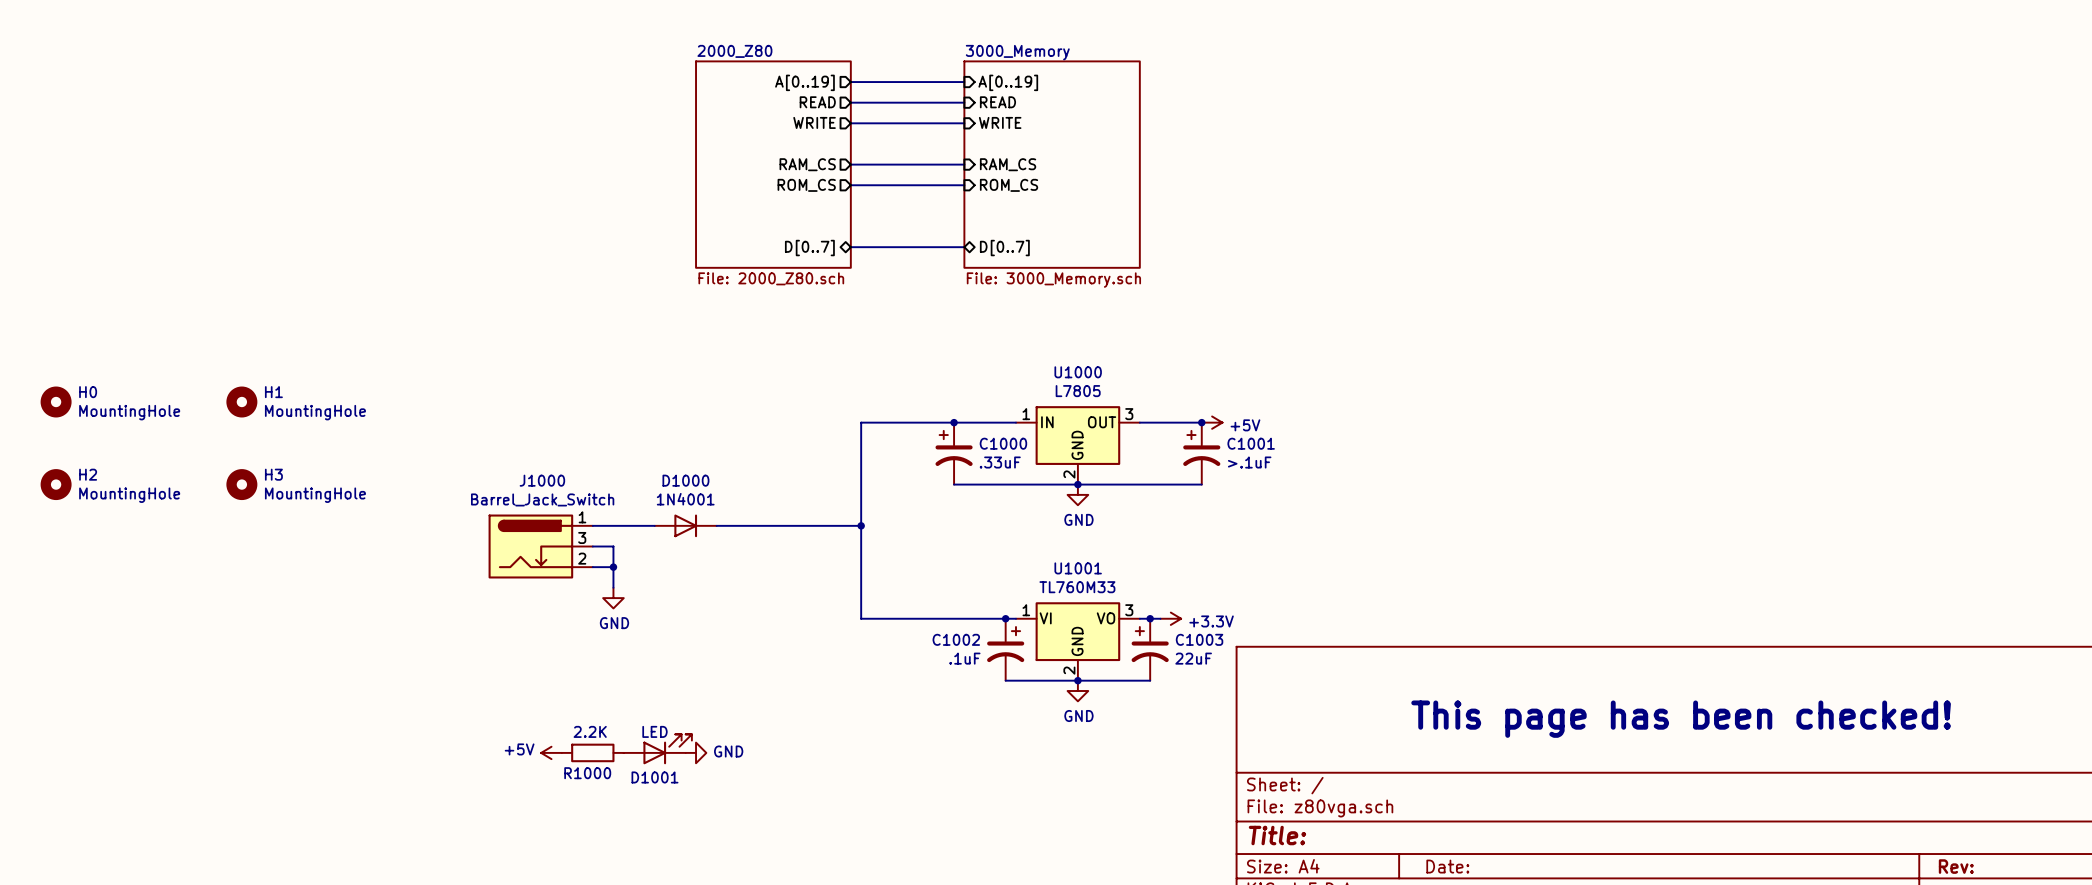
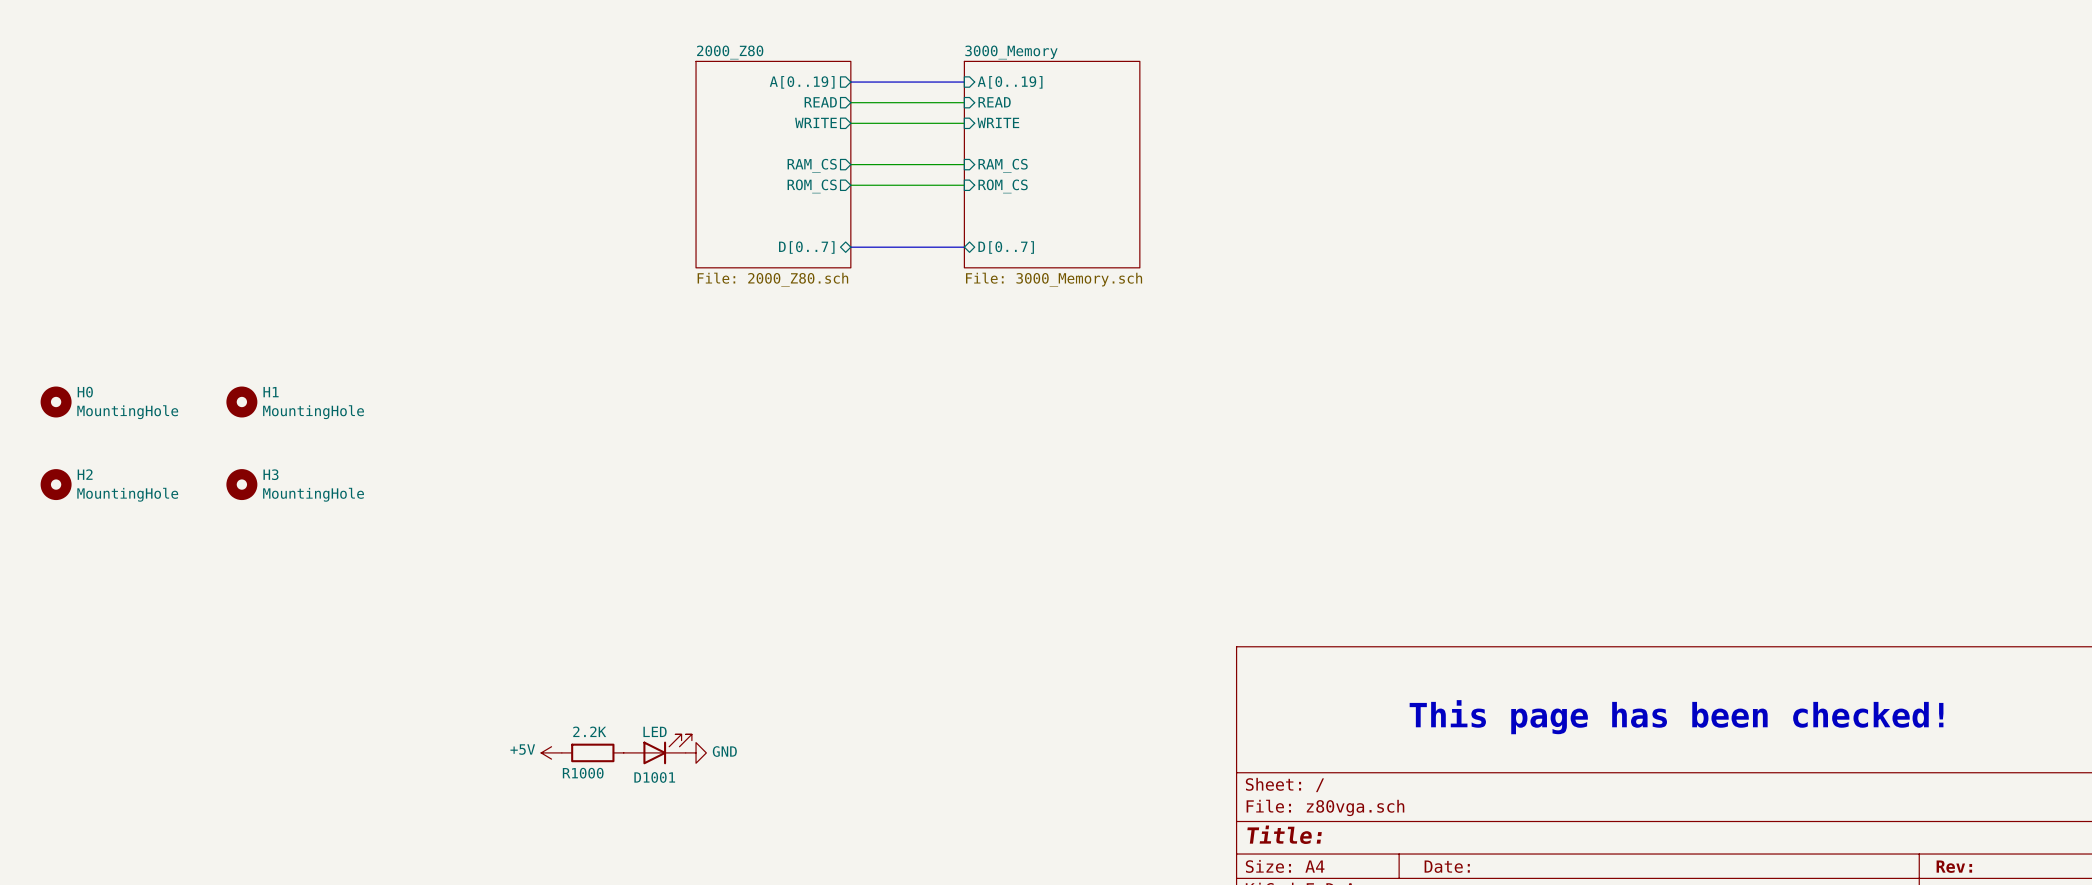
junction: (954, 422) -> none
wire: (1015, 422) (861, 422) (861, 618) (1015, 618) -> none
wire: (1139, 422) (1201, 422) -> none
junction: (1201, 422) -> none
power symbol: +5V (1212, 422) -> none
U1000: L7805 (1077, 445) -> none
C1000: .33uF (954, 453) -> none
C1001: >.1uF (1201, 453) -> none
wire: (954, 484) (1201, 484) -> none
junction: (1077, 484) -> none
power symbol: GND (1077, 494) -> none
wire: (592, 525) (654, 525) -> none
D1000: 1N4001 (685, 525) -> none
wire: (716, 525) (861, 525) -> none
junction: (861, 525) -> none
J1000: Barrel_Jack_Switch (540, 546) -> none
wire: (592, 546) (613, 546) (613, 587) -> none
wire: (592, 567) (613, 567) -> none
junction: (613, 567) -> none
power symbol: GND (613, 598) -> none
junction: (1005, 618) -> none
wire: (1139, 618) (1160, 618) -> none
junction: (1150, 618) -> none
power symbol: +3.3V (1170, 618) -> none
U1001: TL760M33 (1077, 641) -> none
C1002: .1uF (1005, 649) -> none
C1003: 22uF (1150, 649) -> none
wire: (1005, 680) (1150, 680) -> none
junction: (1077, 680) -> none
power symbol: GND (1077, 691) -> none

